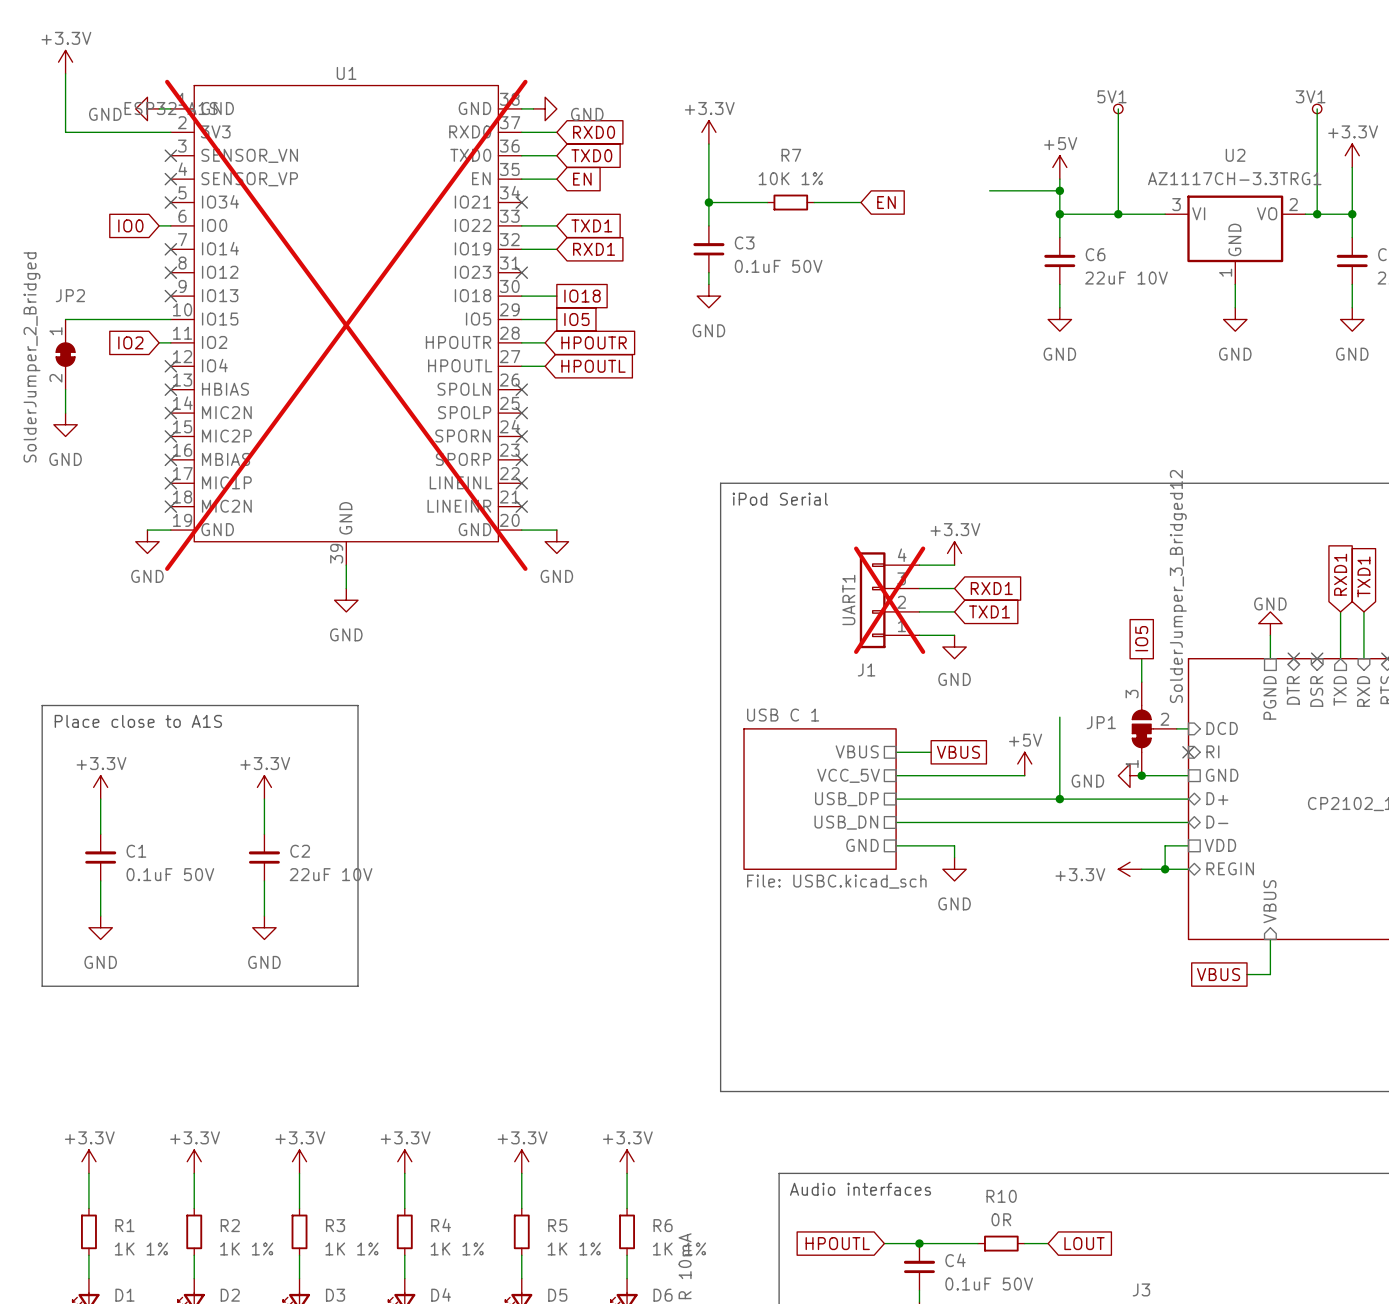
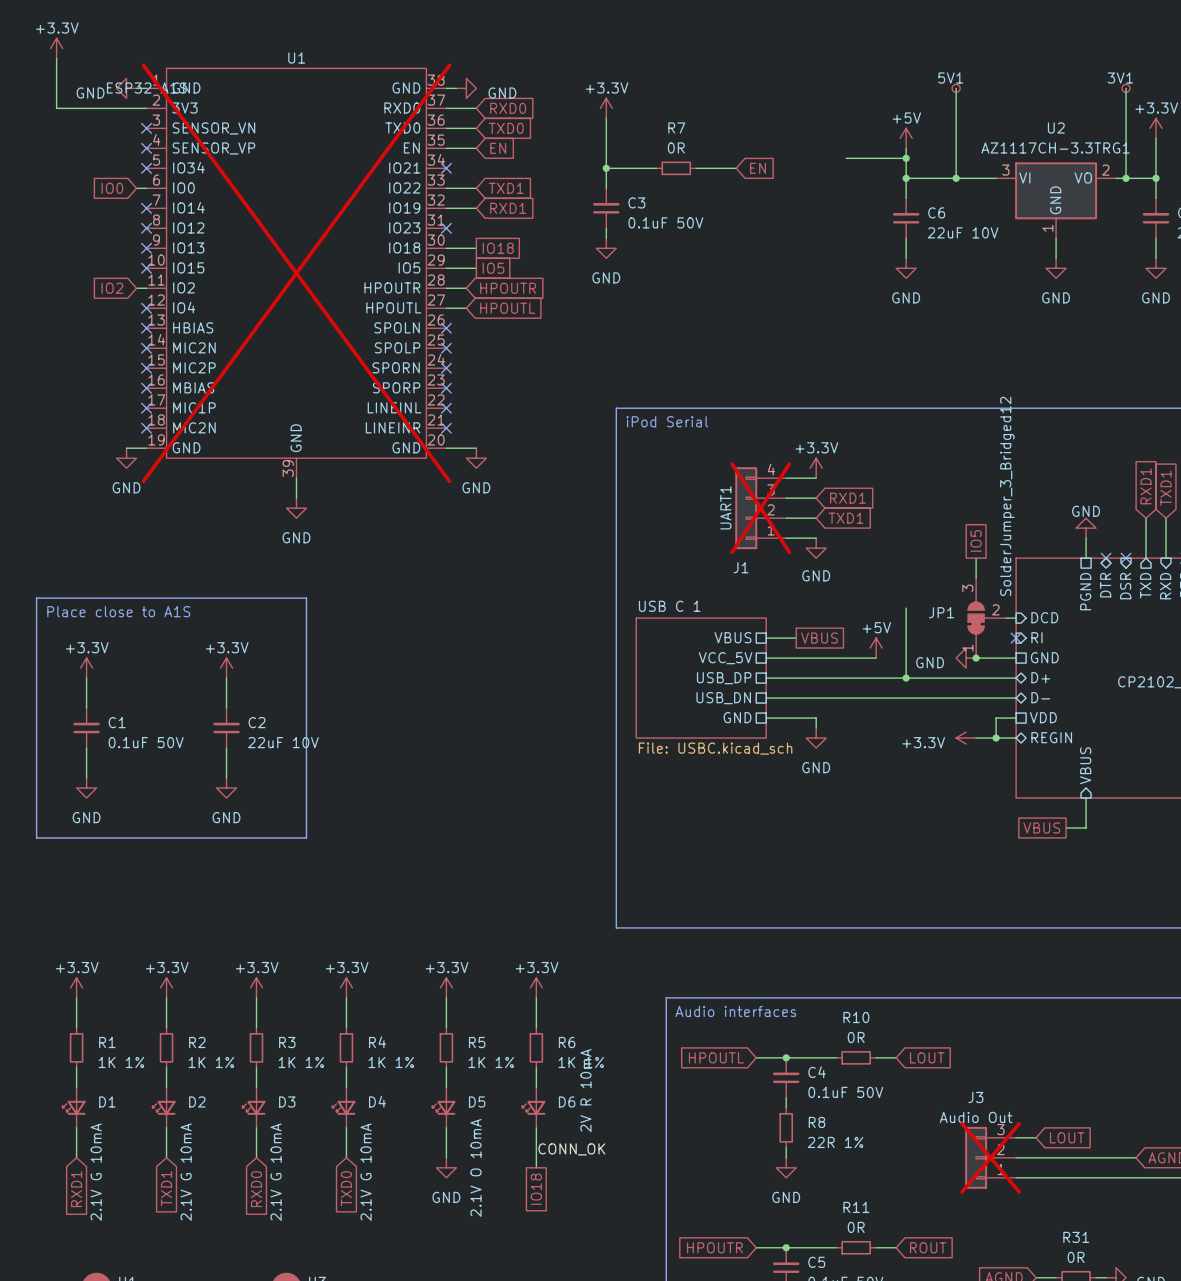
R7 value: 10K 1% (790, 178) -> 0R (676, 147)
wire: (65, 319) (170, 319) -> none
no-connect mark: none -> (146, 268)
JP2: SolderJumper_2_Bridged (65, 354) -> none
wire: (65, 389) (65, 413) -> none
power symbol: GND (65, 424) -> none

